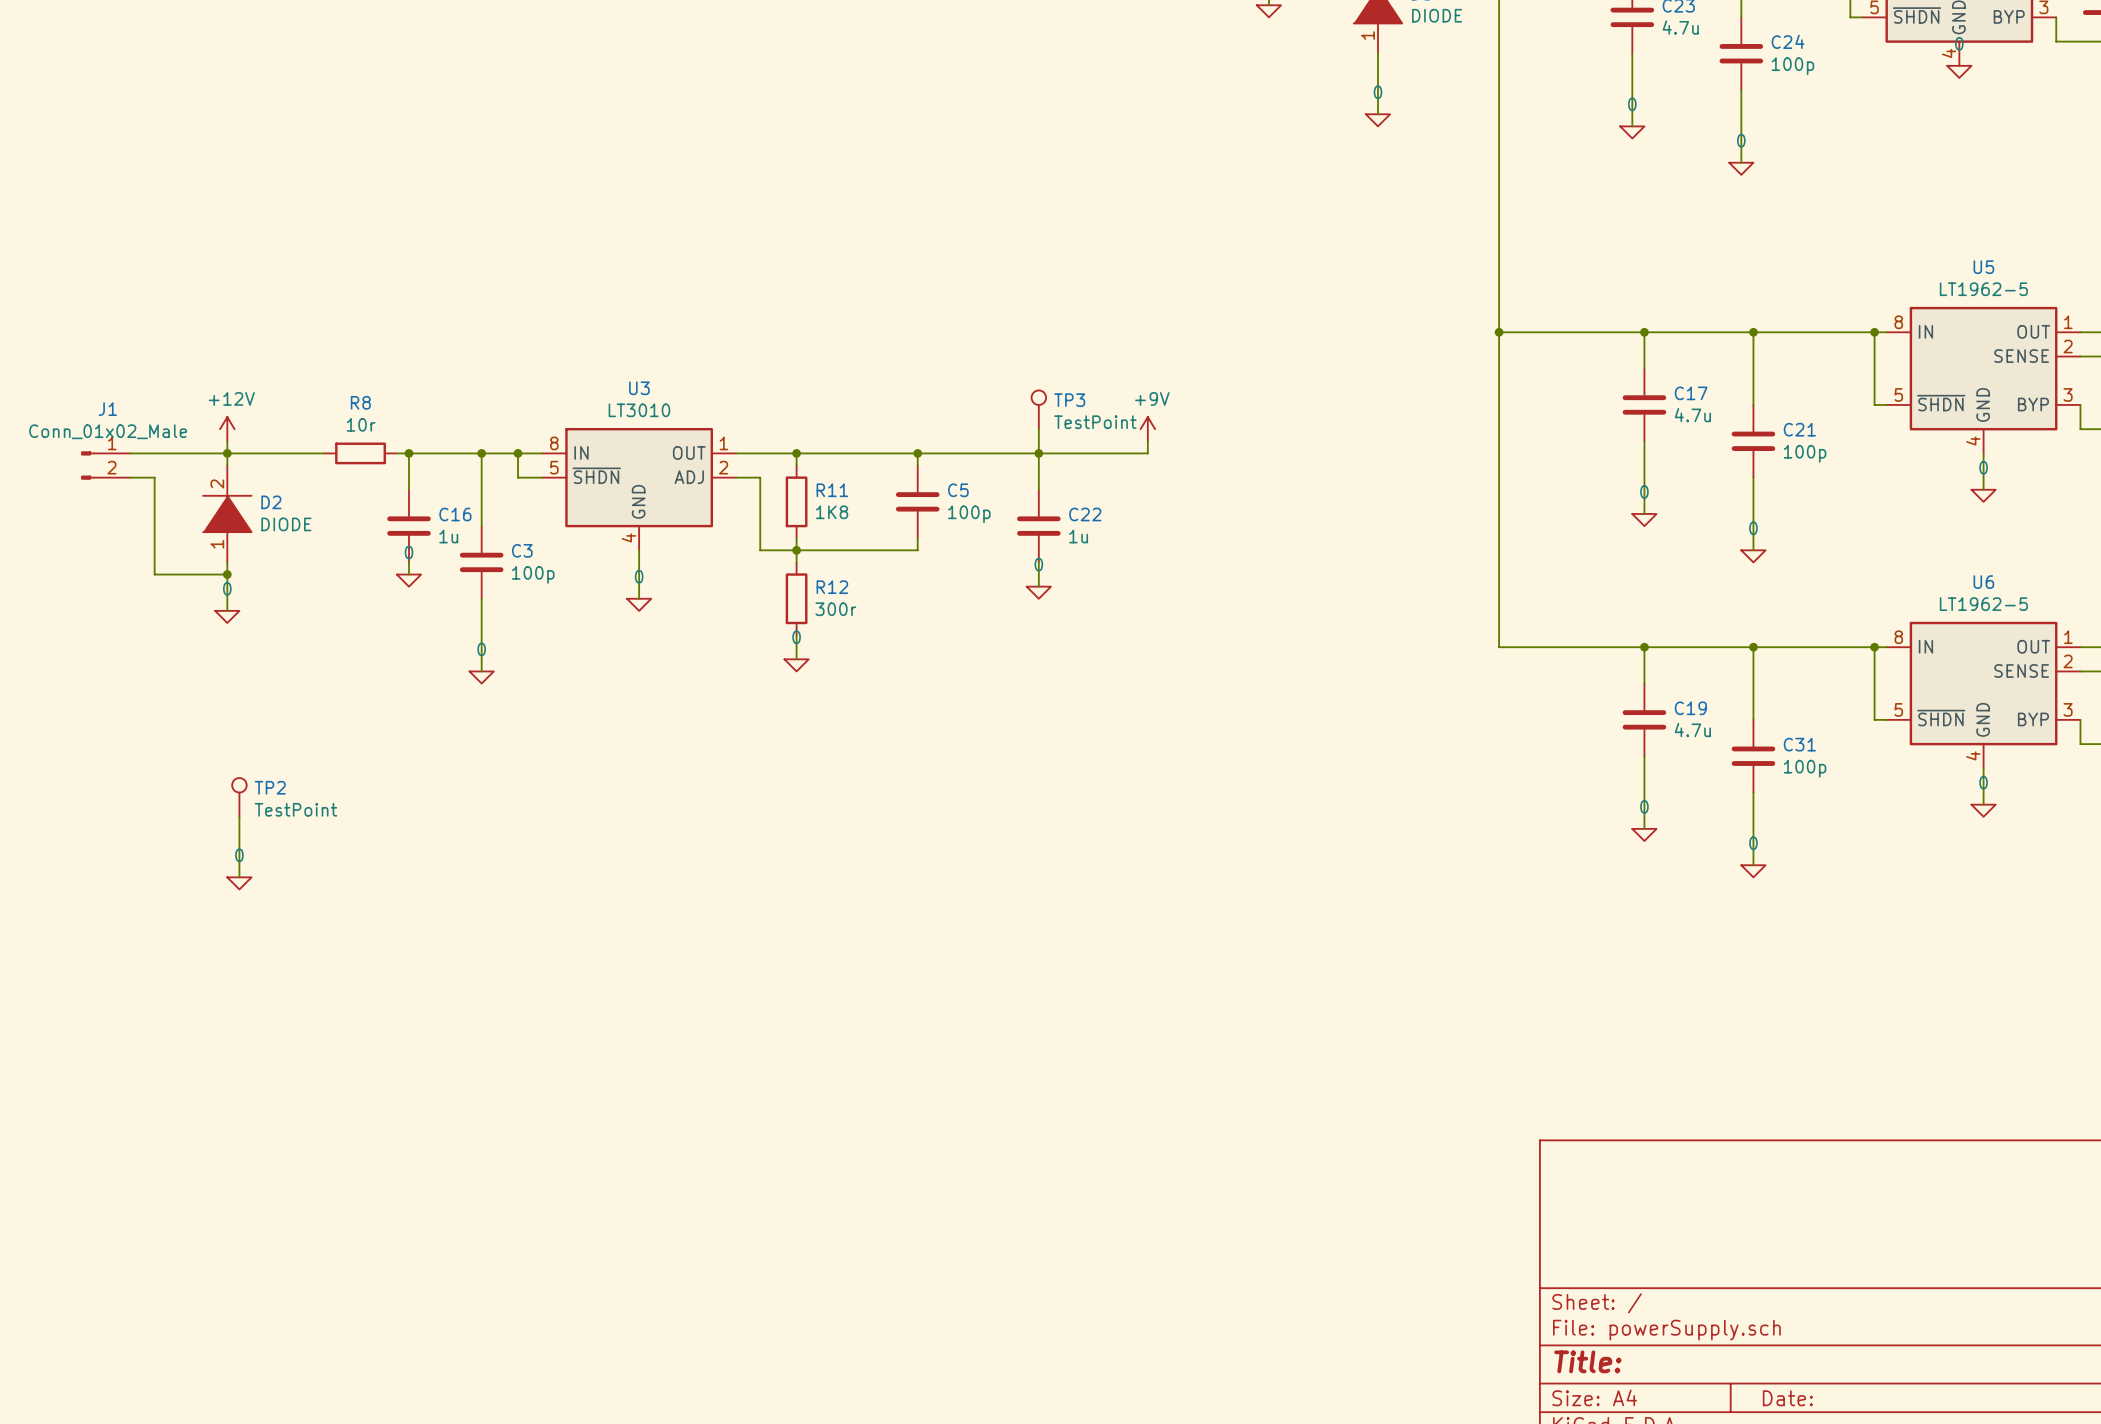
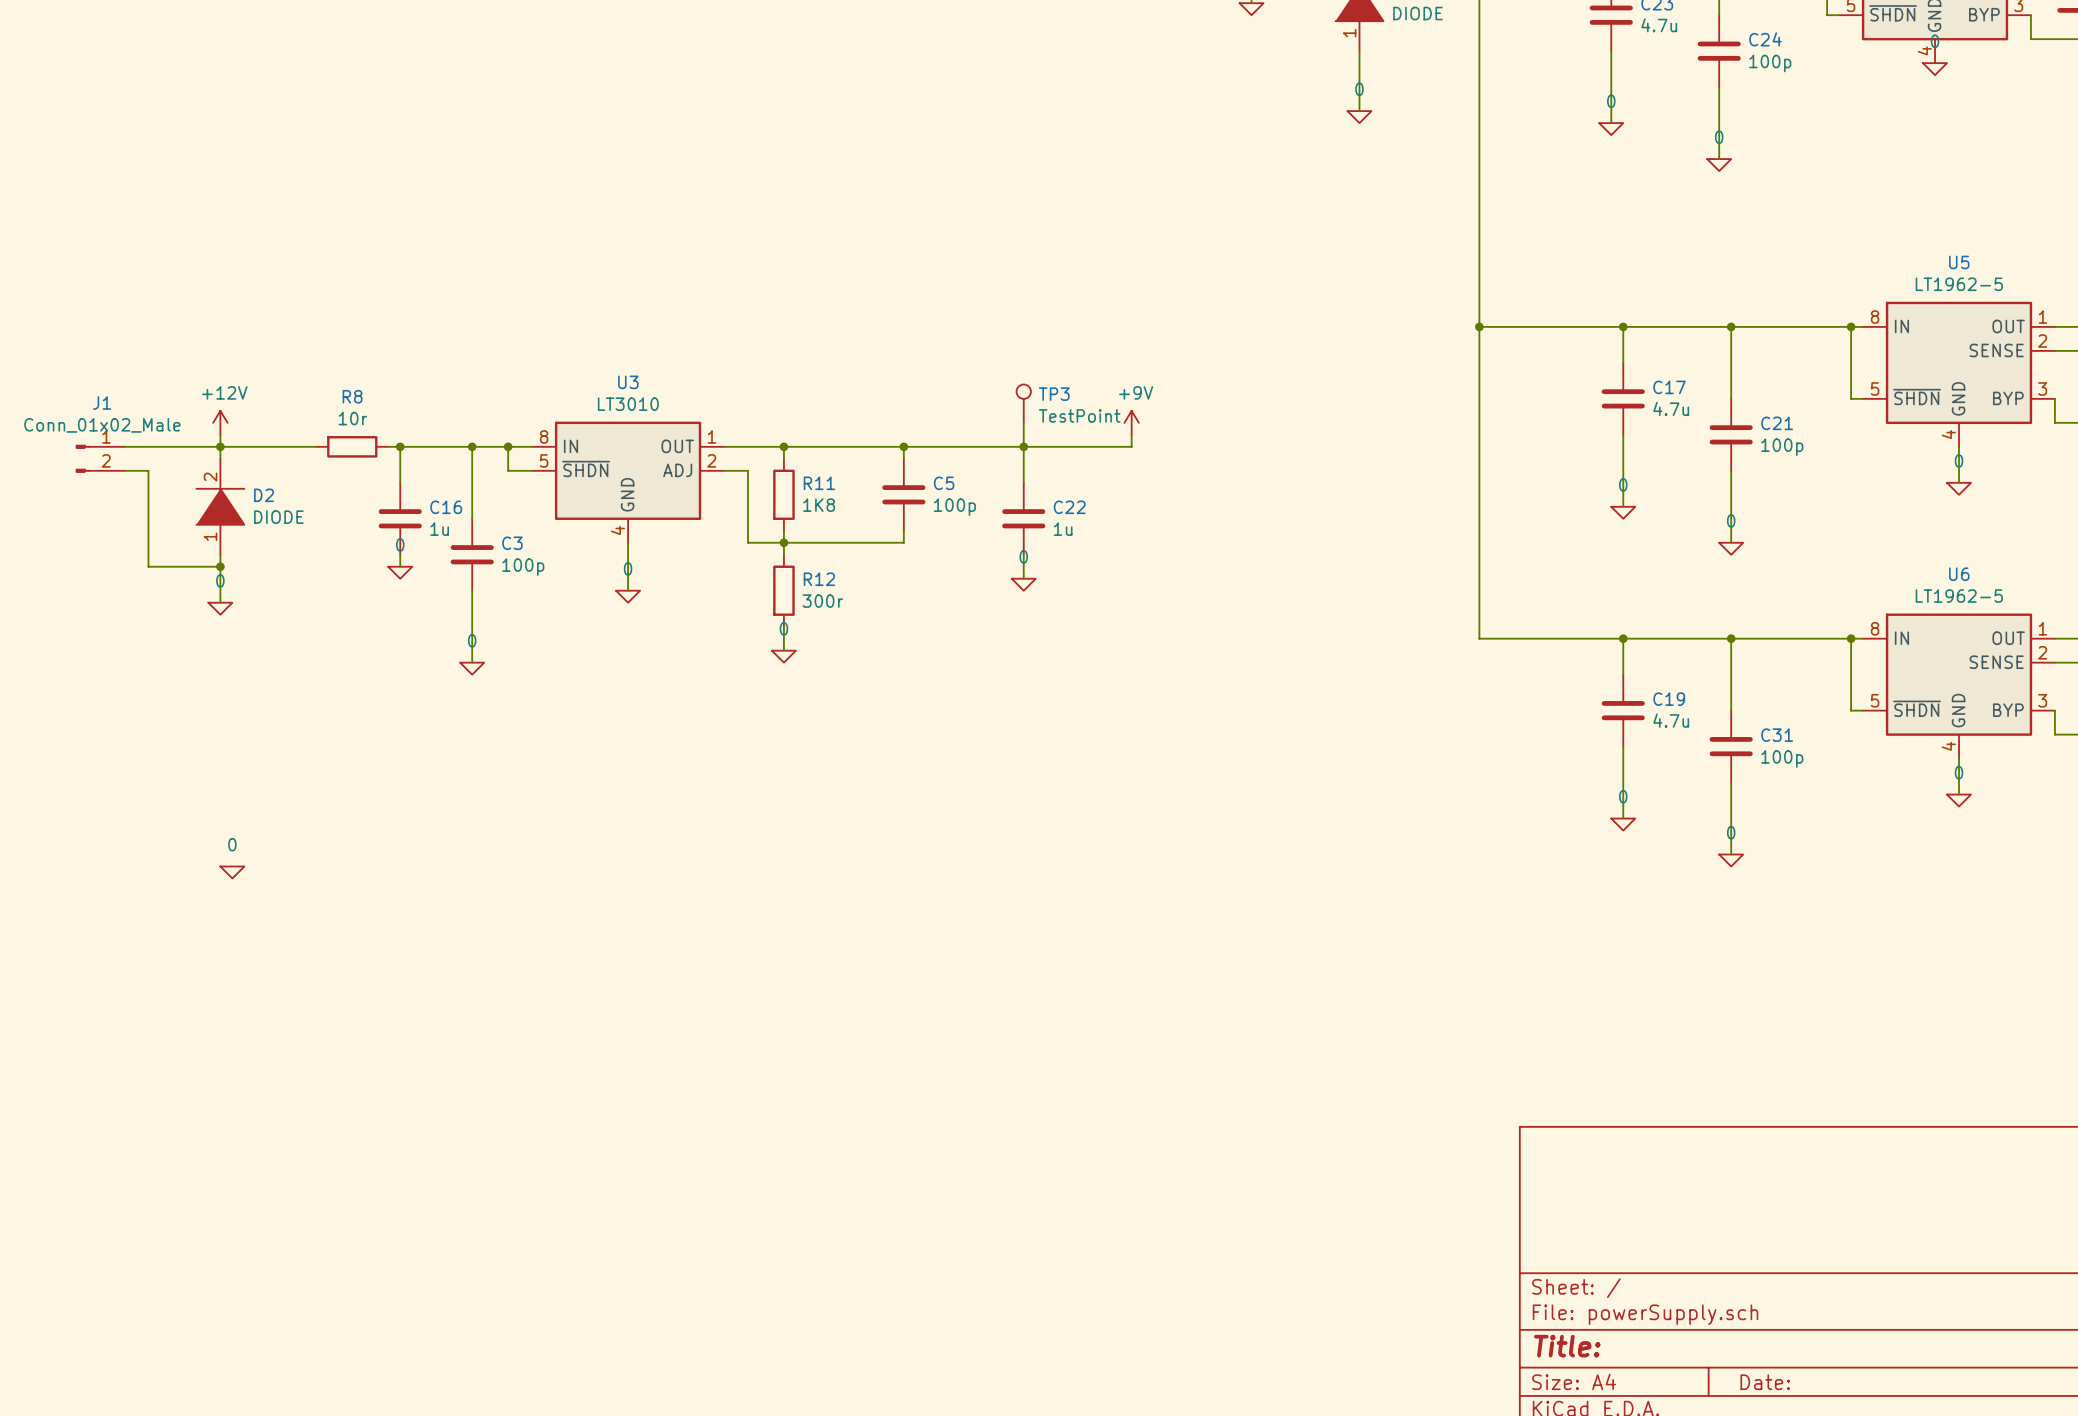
TP2: TestPoint (239, 797) -> none
wire: (239, 816) (239, 877) -> none

